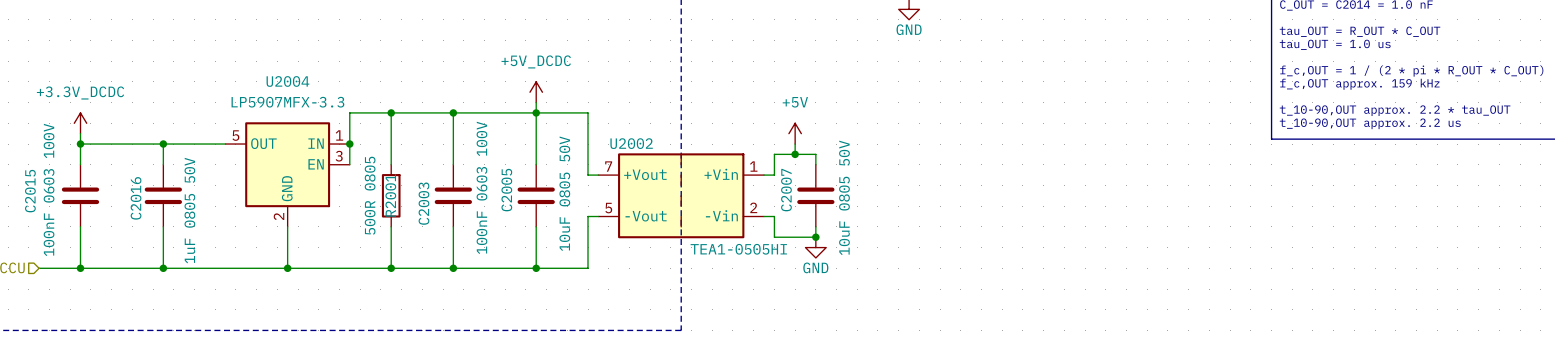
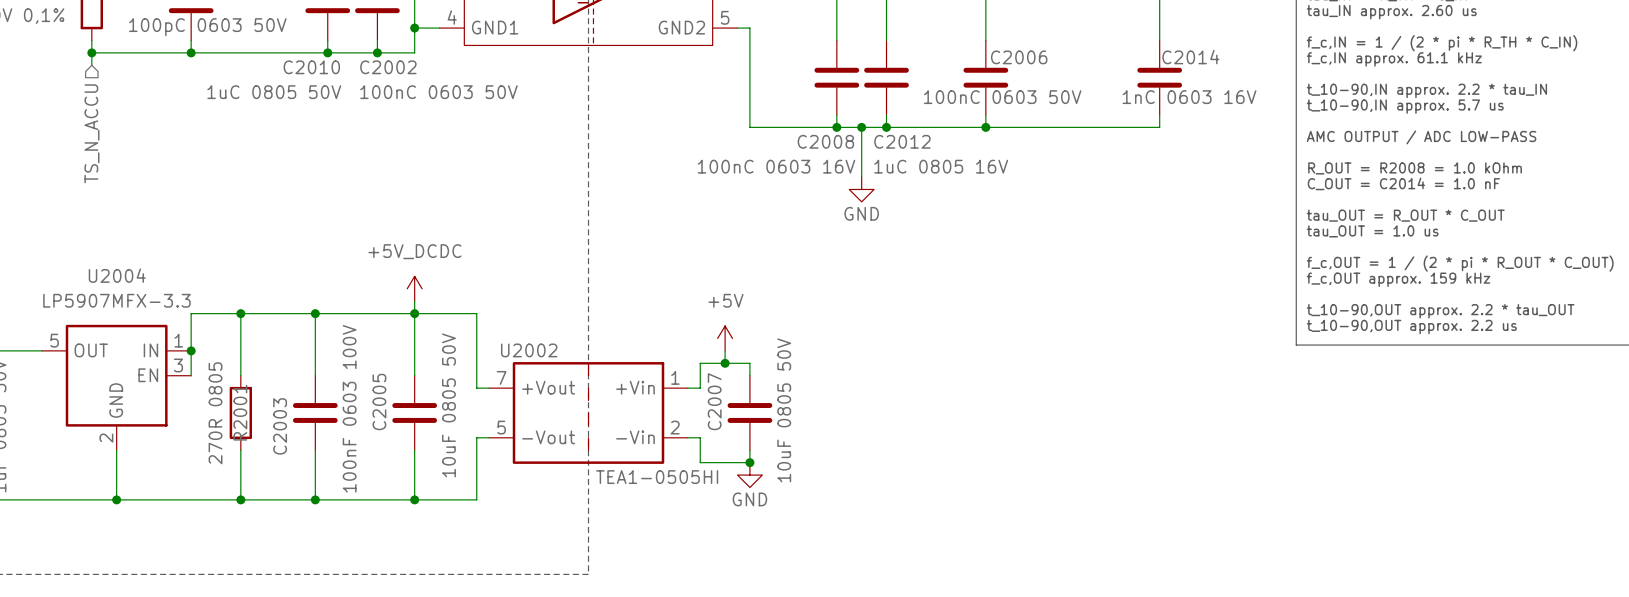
R2001 value: 500R 0805 (370, 195) -> 270R 0805 (215, 413)

